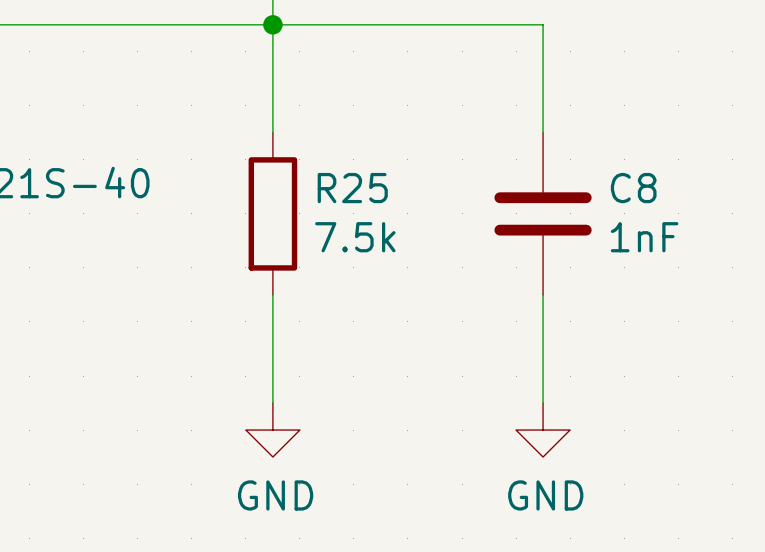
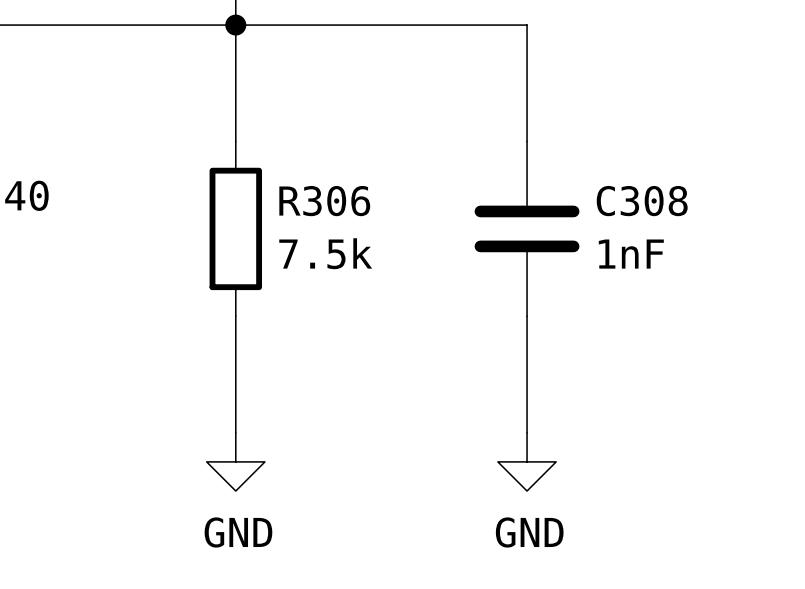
R25 name: R25 (352, 188) -> R306 (324, 201)
C8 name: C8 (633, 188) -> C308 (642, 201)

